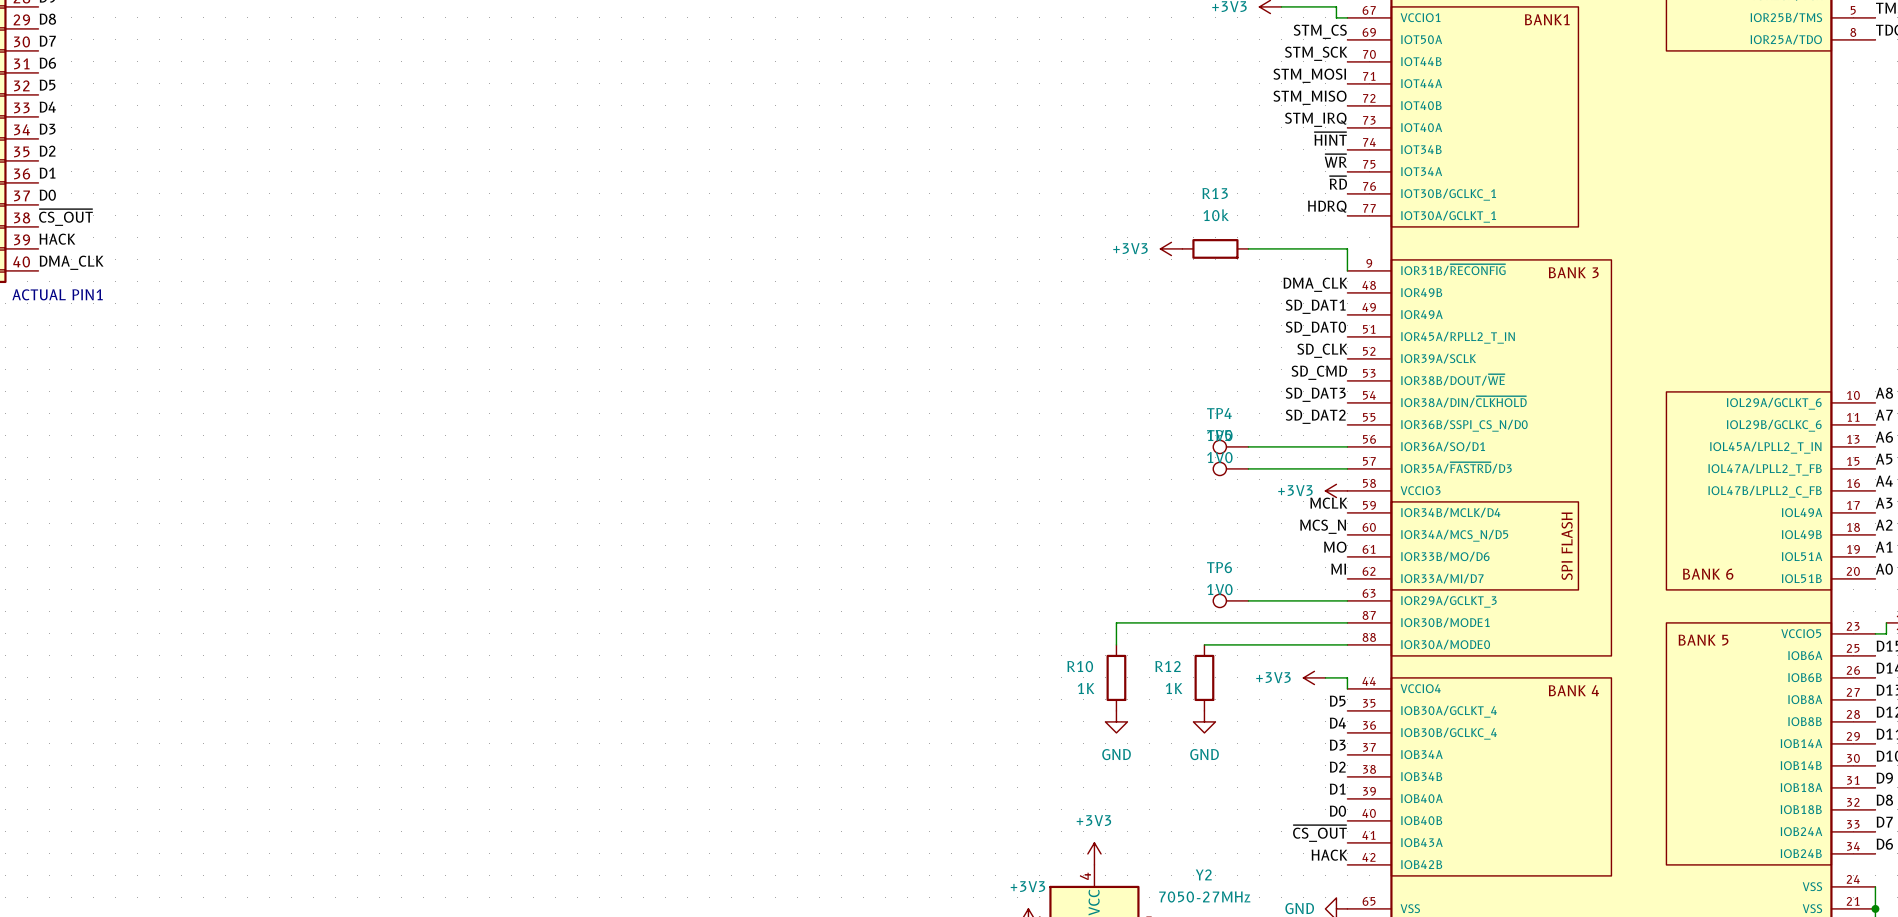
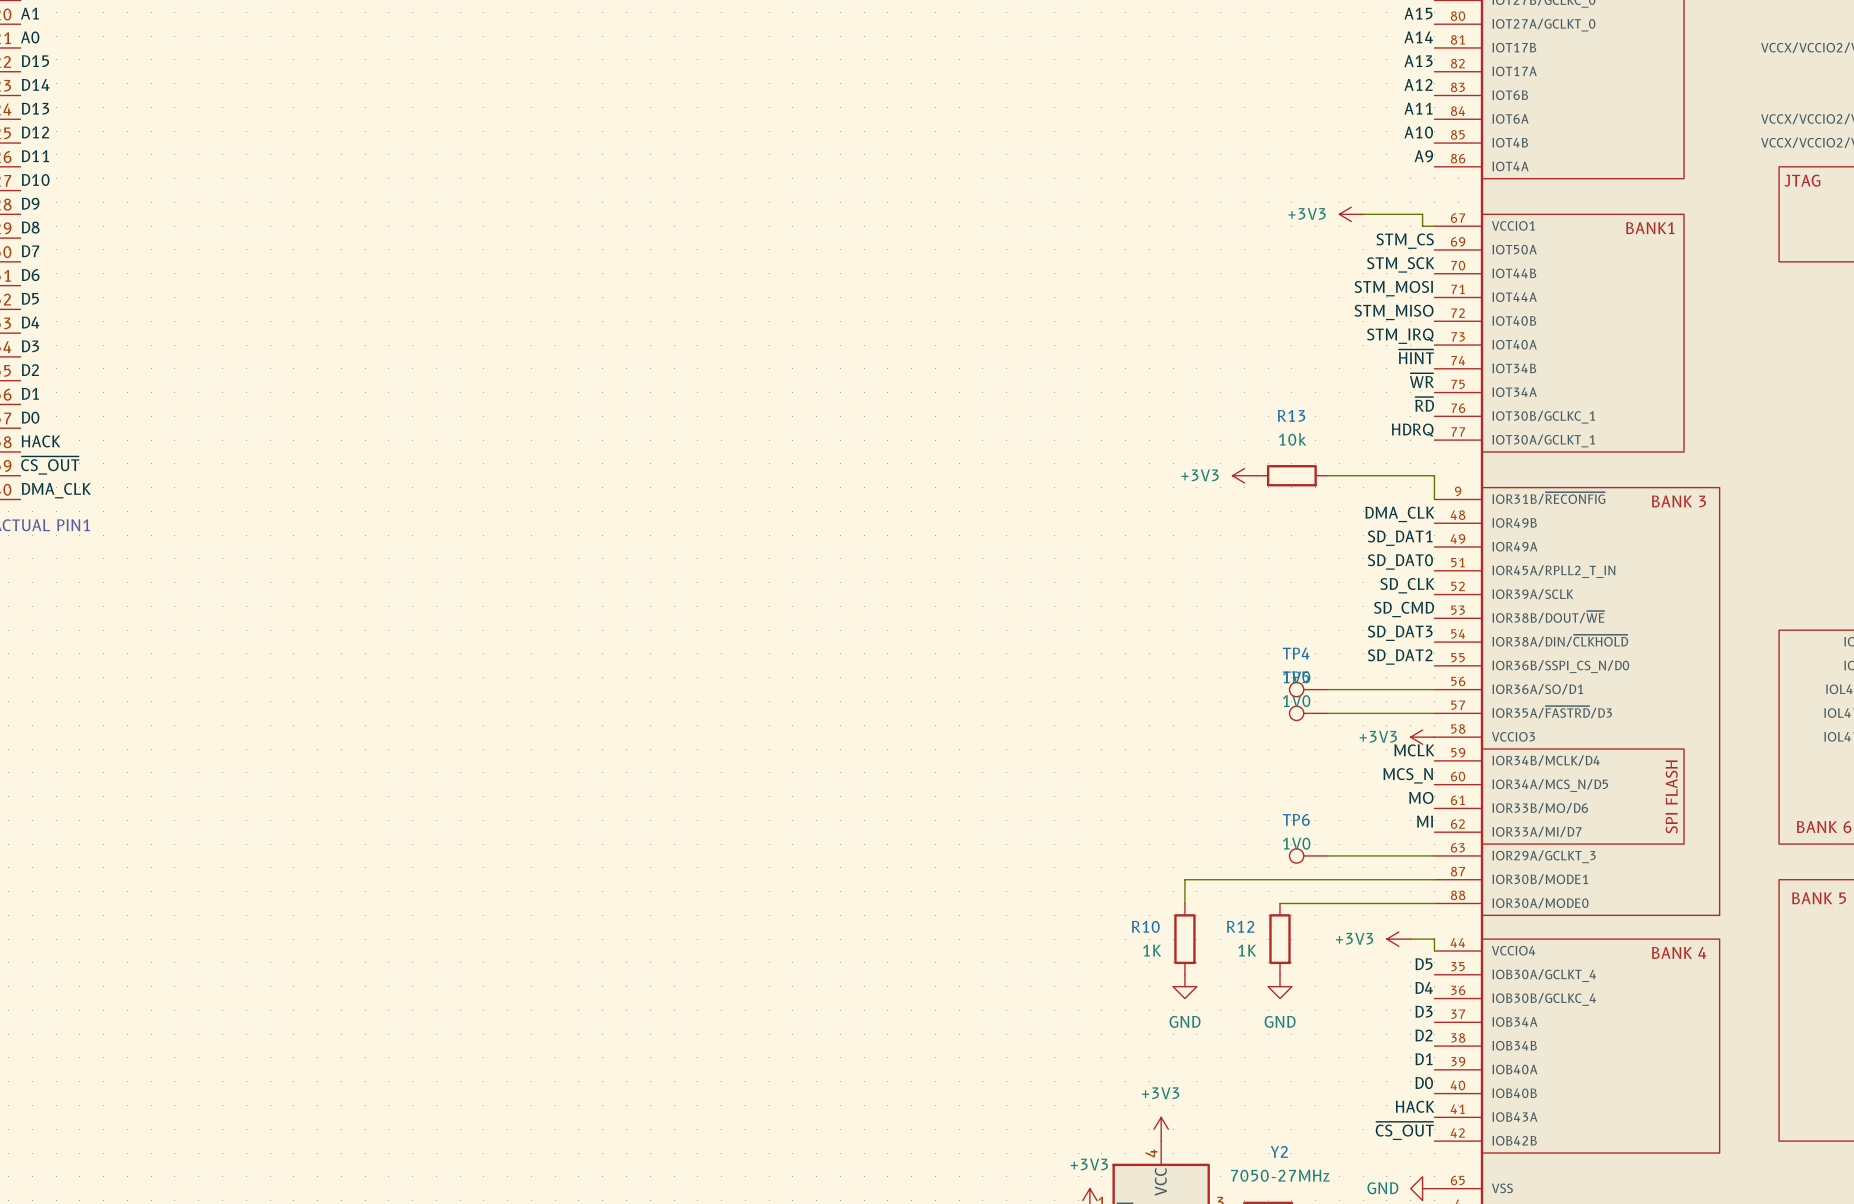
label: ~{CS_OUT} (65, 217) -> HACK (40, 441)
label: HACK (57, 239) -> ~{CS_OUT} (50, 465)
label: ~{CS_OUT} (1319, 833) -> HACK (1415, 1106)
label: HACK (1329, 855) -> ~{CS_OUT} (1404, 1130)

